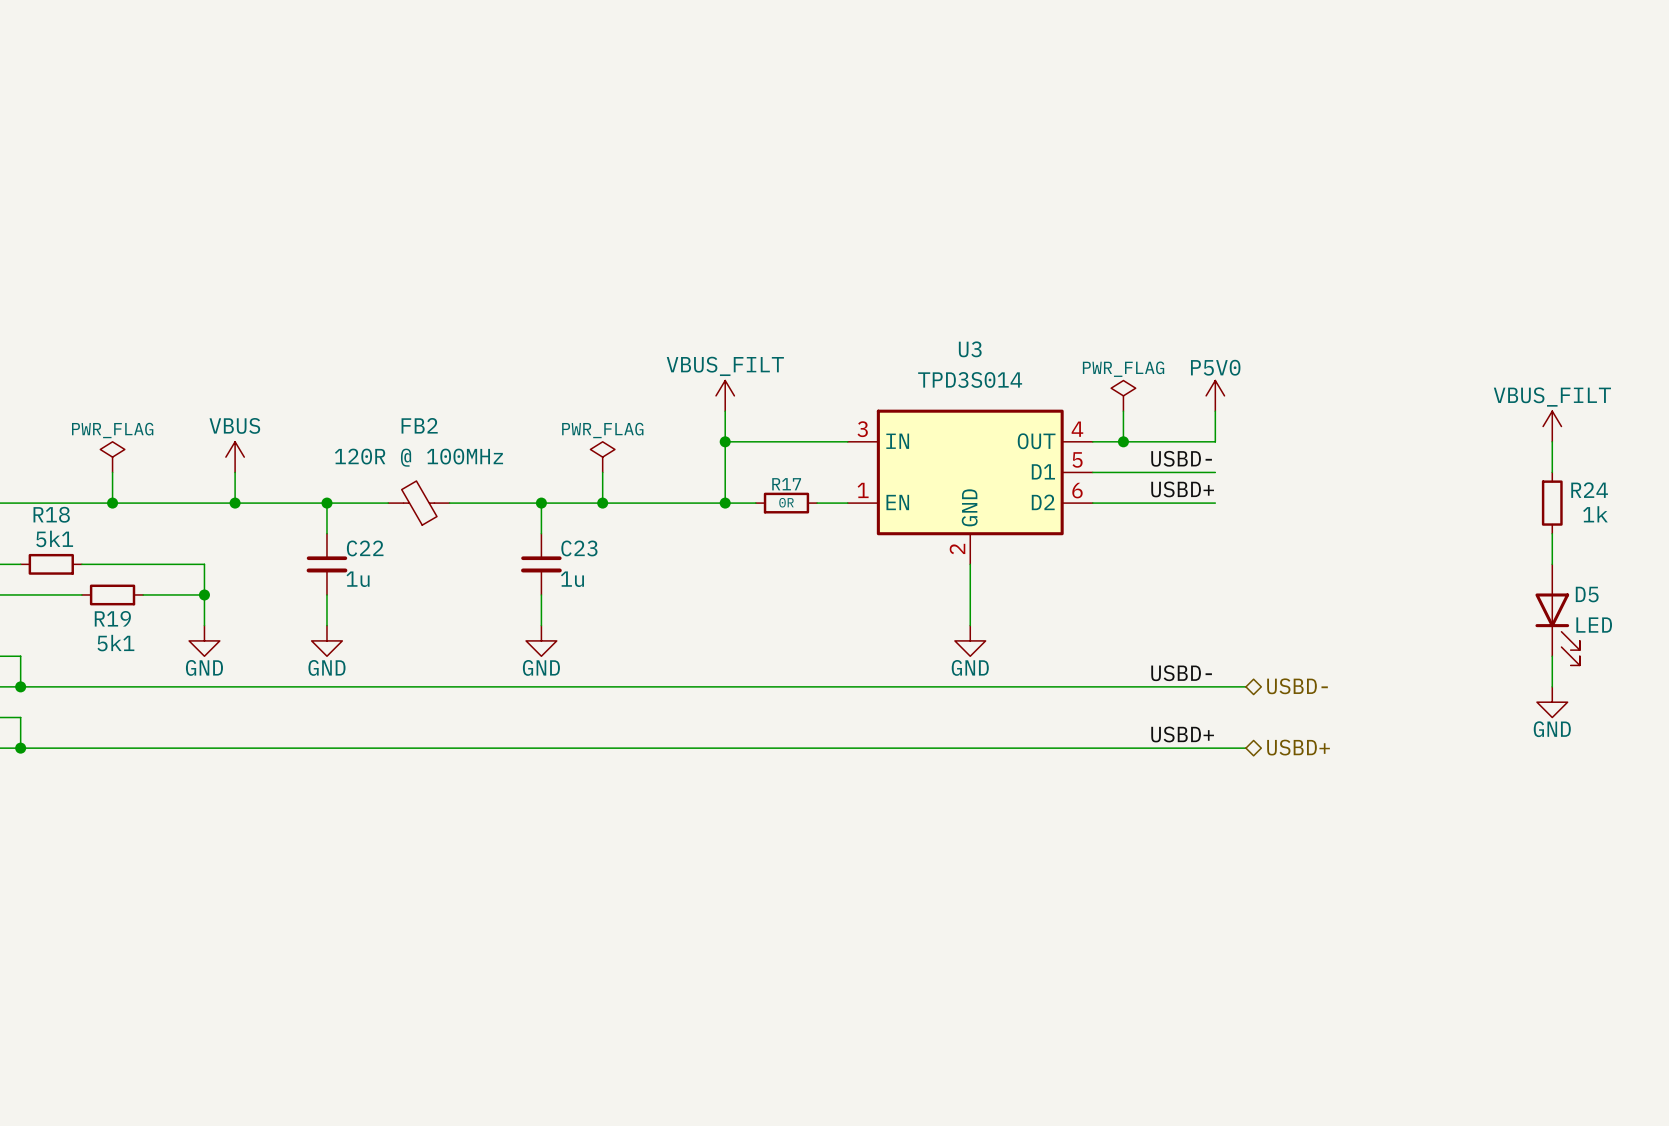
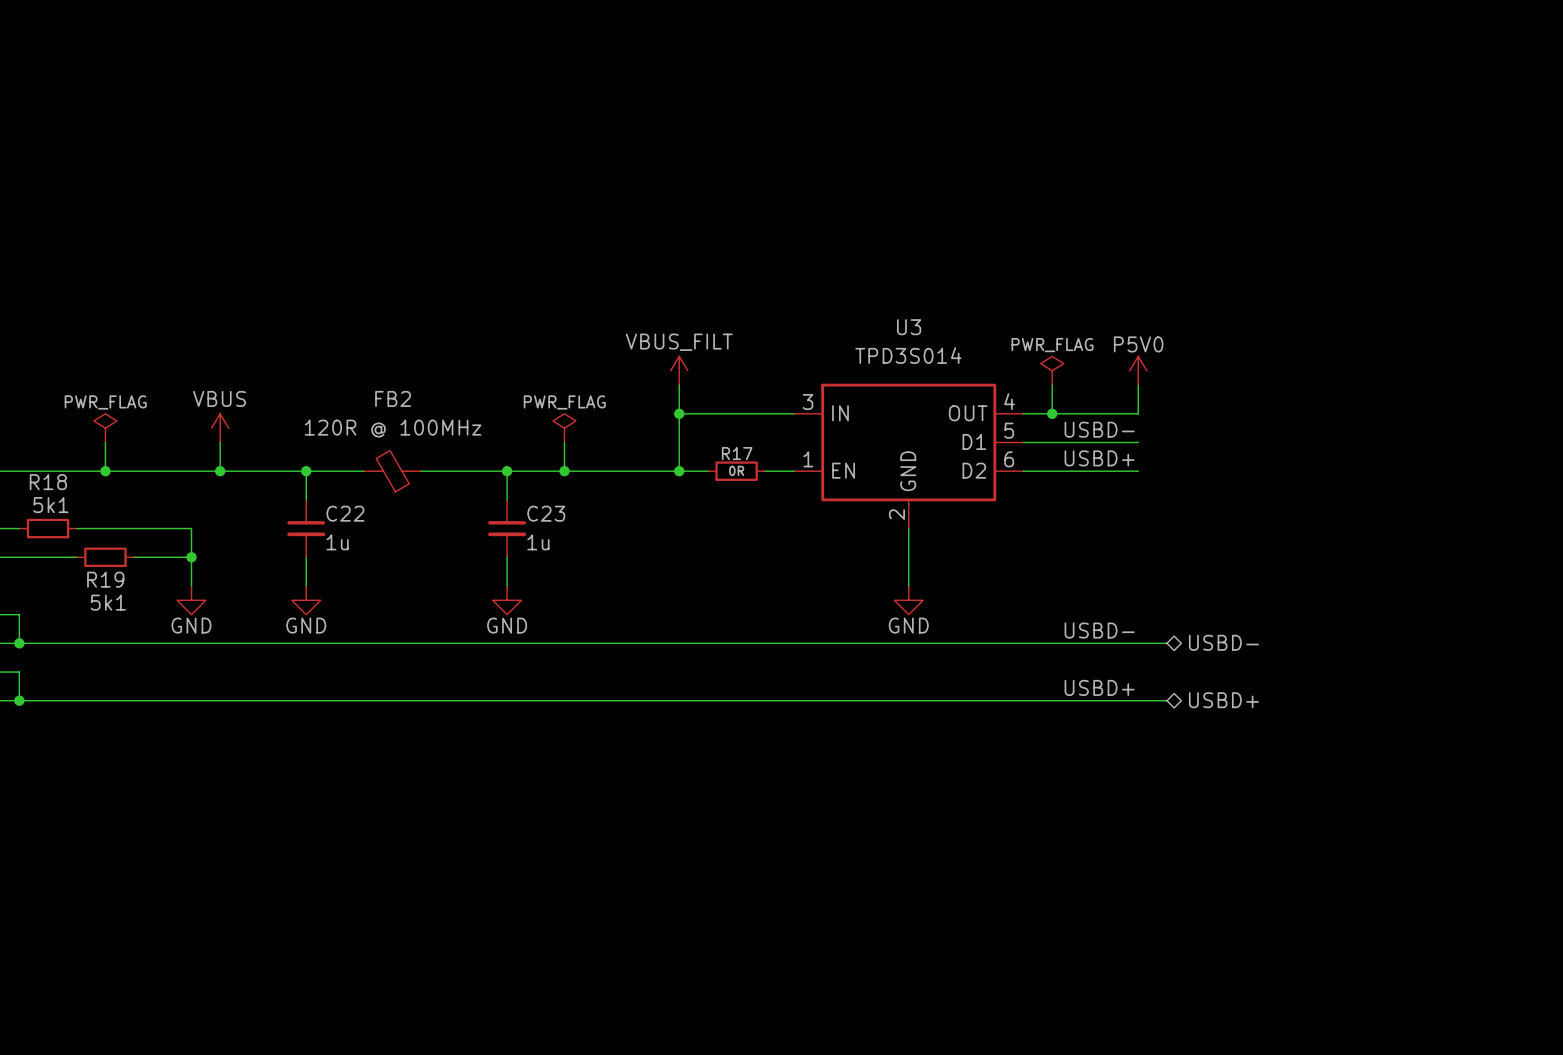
power symbol: VBUS_FILT (1552, 426) -> none
wire: (1552, 441) (1552, 472) -> none
R24: 1k (1552, 503) -> none
wire: (1552, 533) (1552, 564) -> none
D5: LED (1557, 614) -> none
wire: (1552, 656) (1552, 686) -> none
power symbol: GND (1552, 702) -> none

